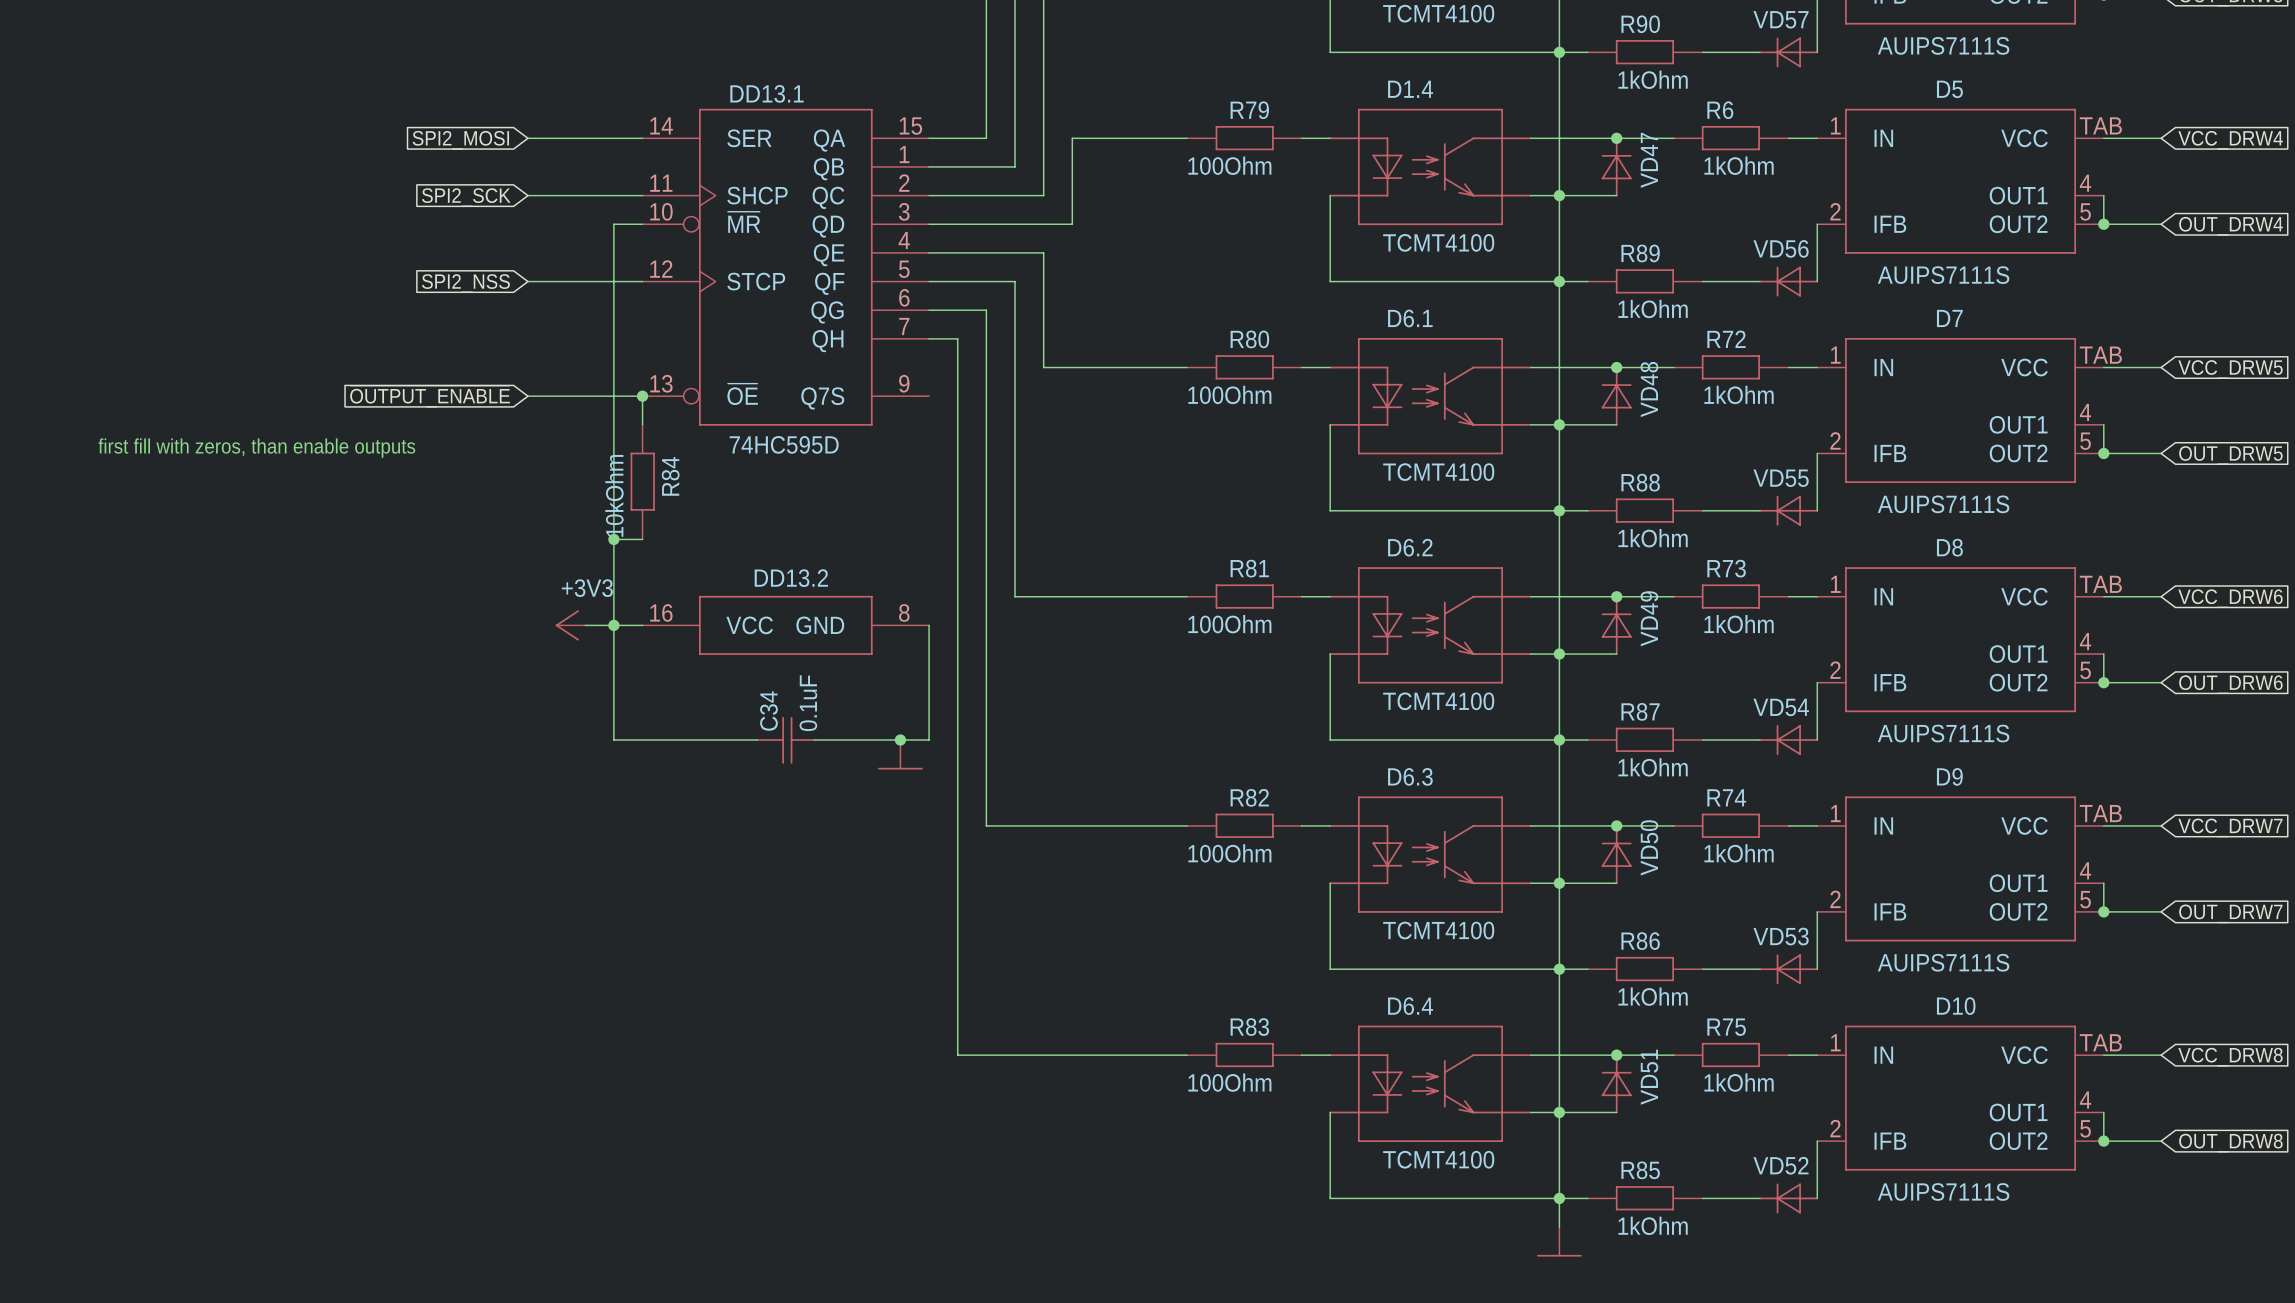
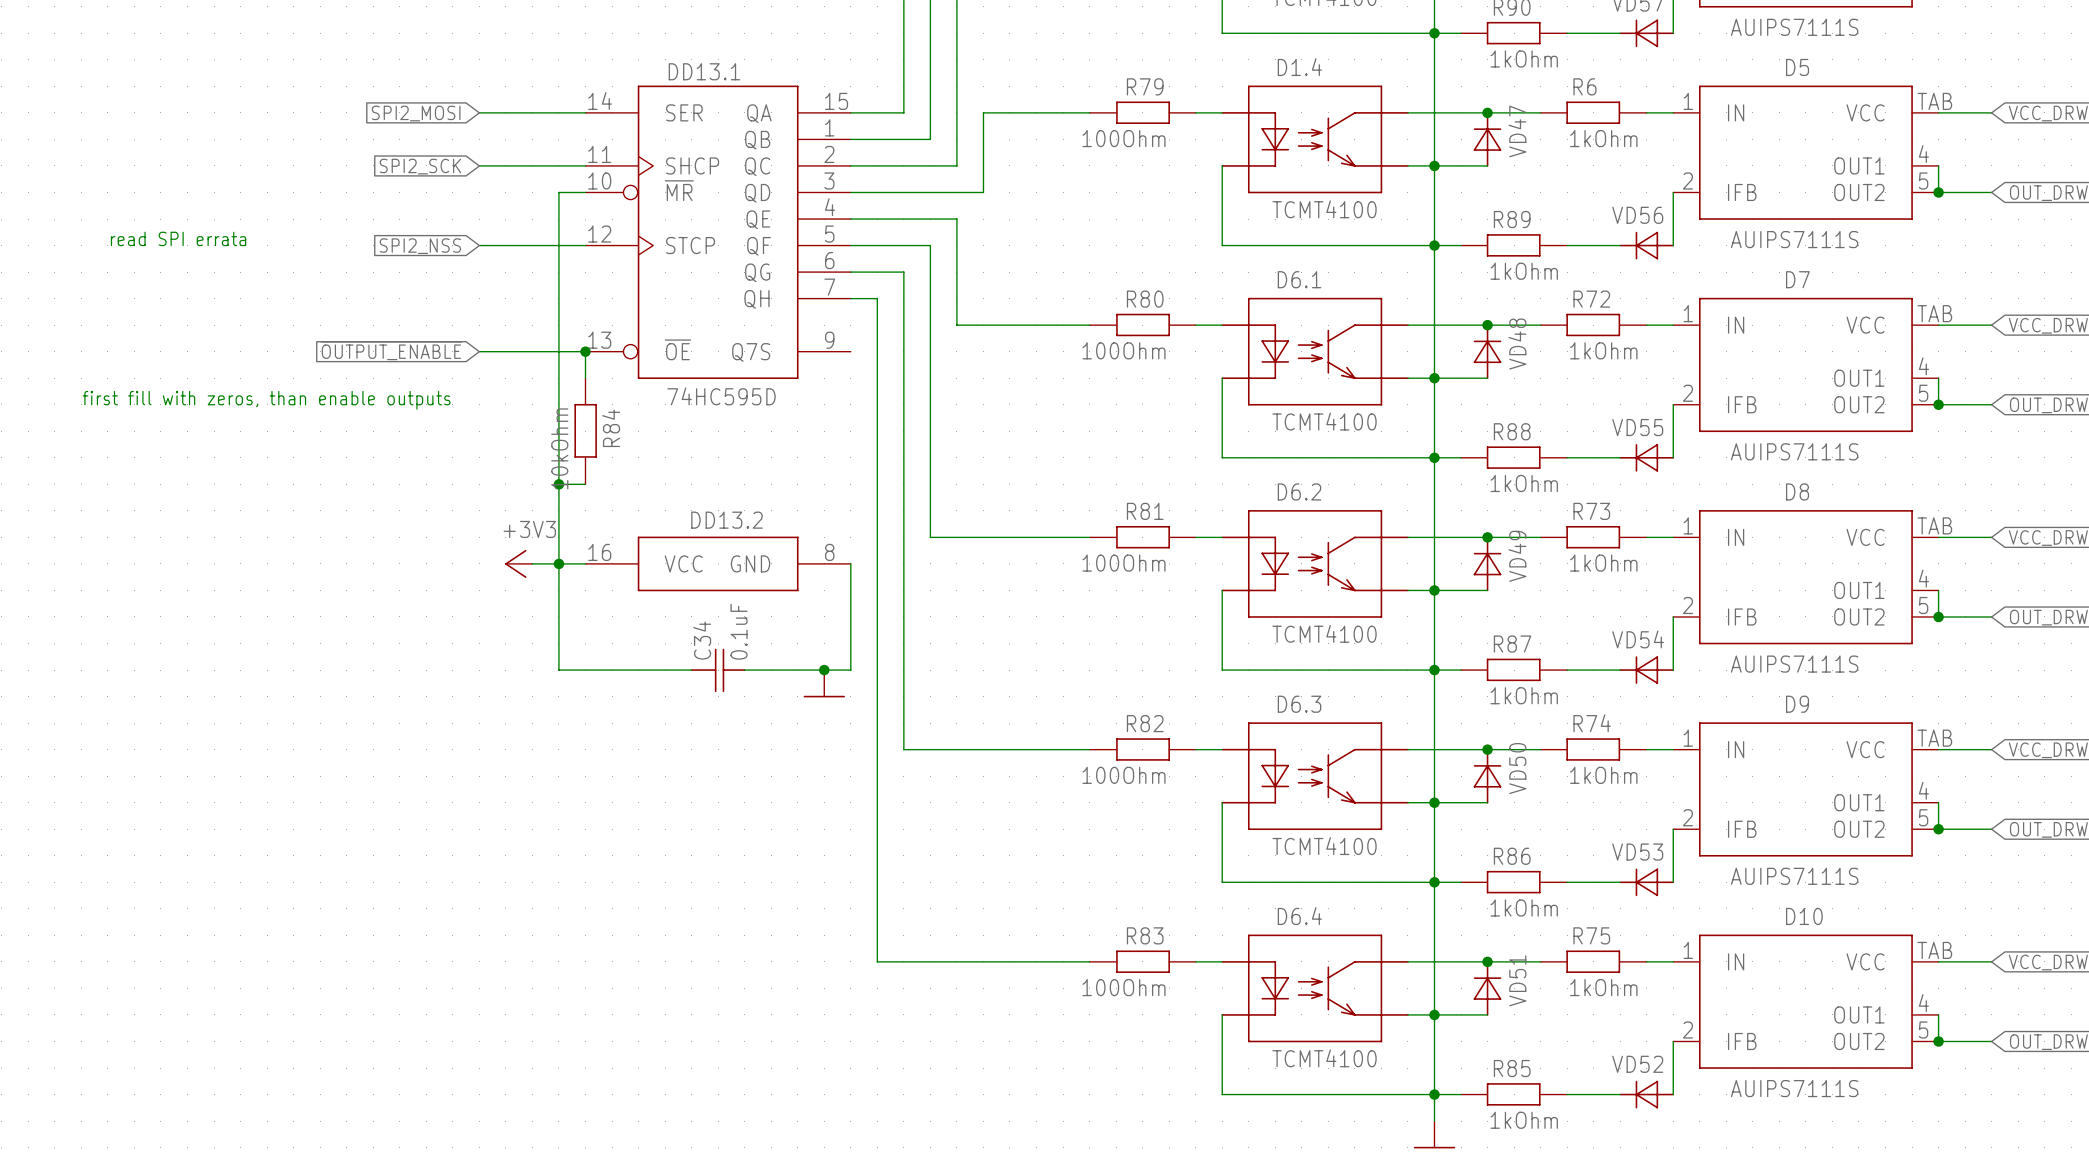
text: none -> read SPI errata (178, 238)

